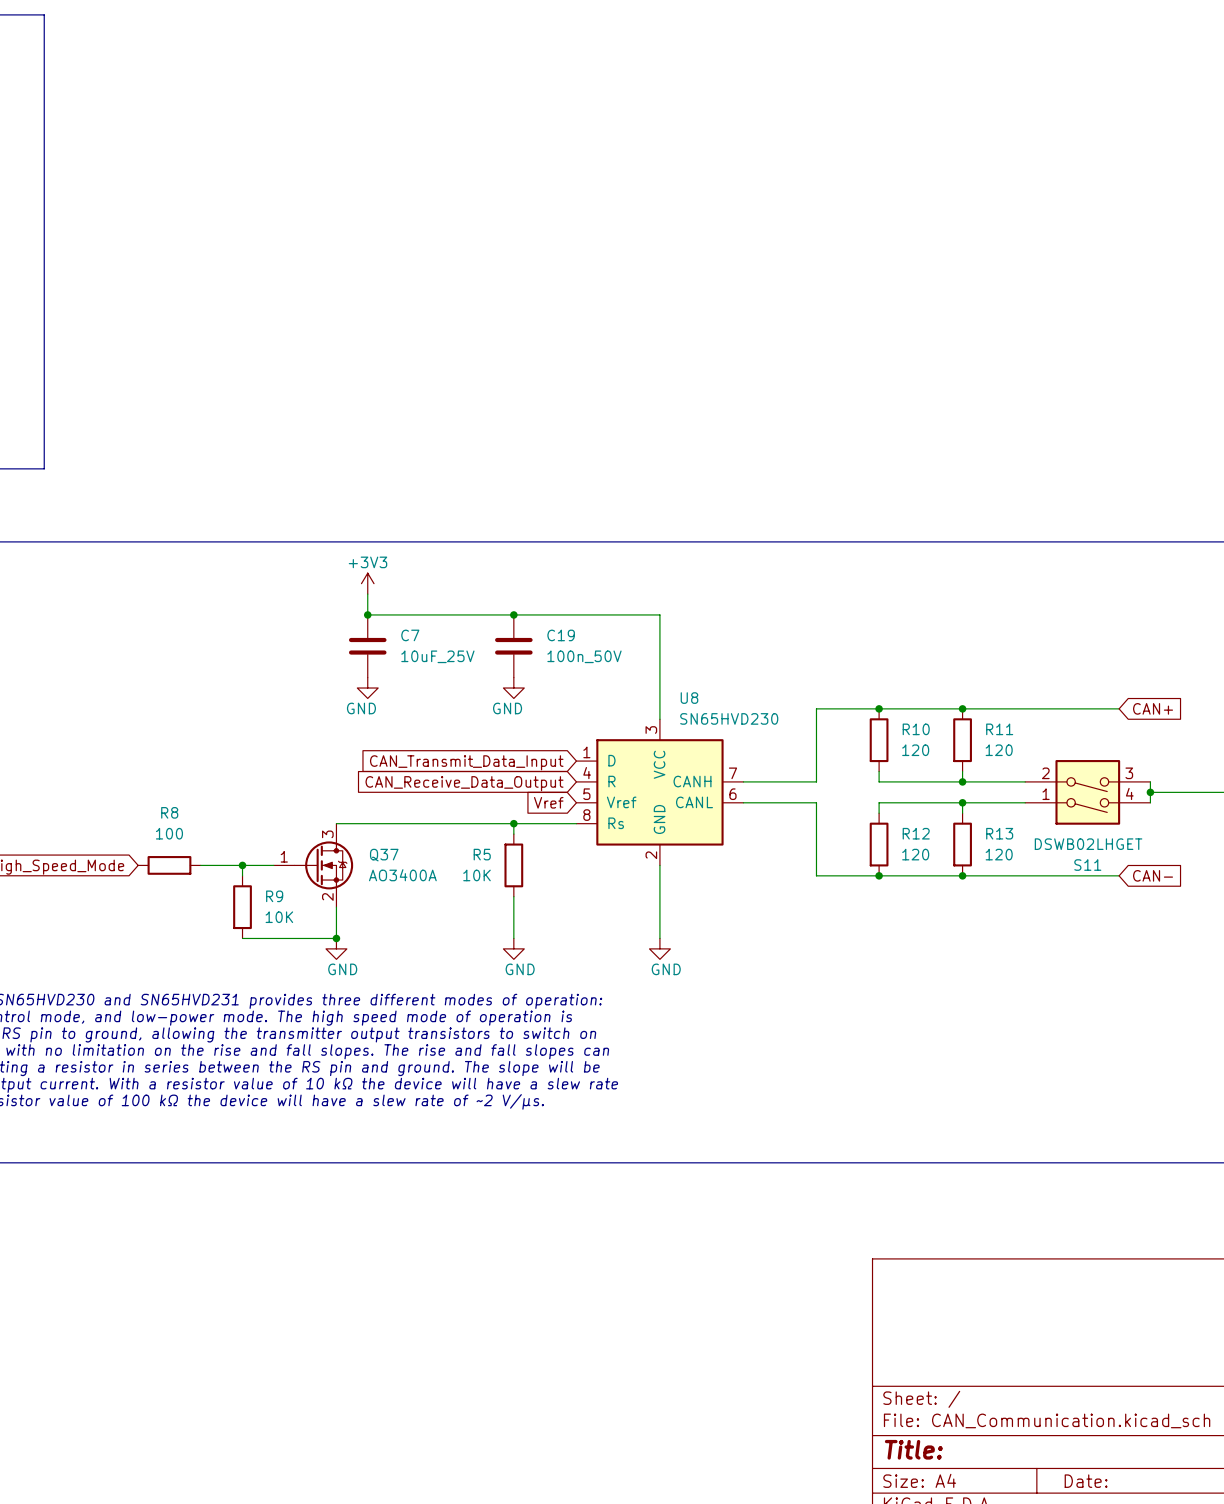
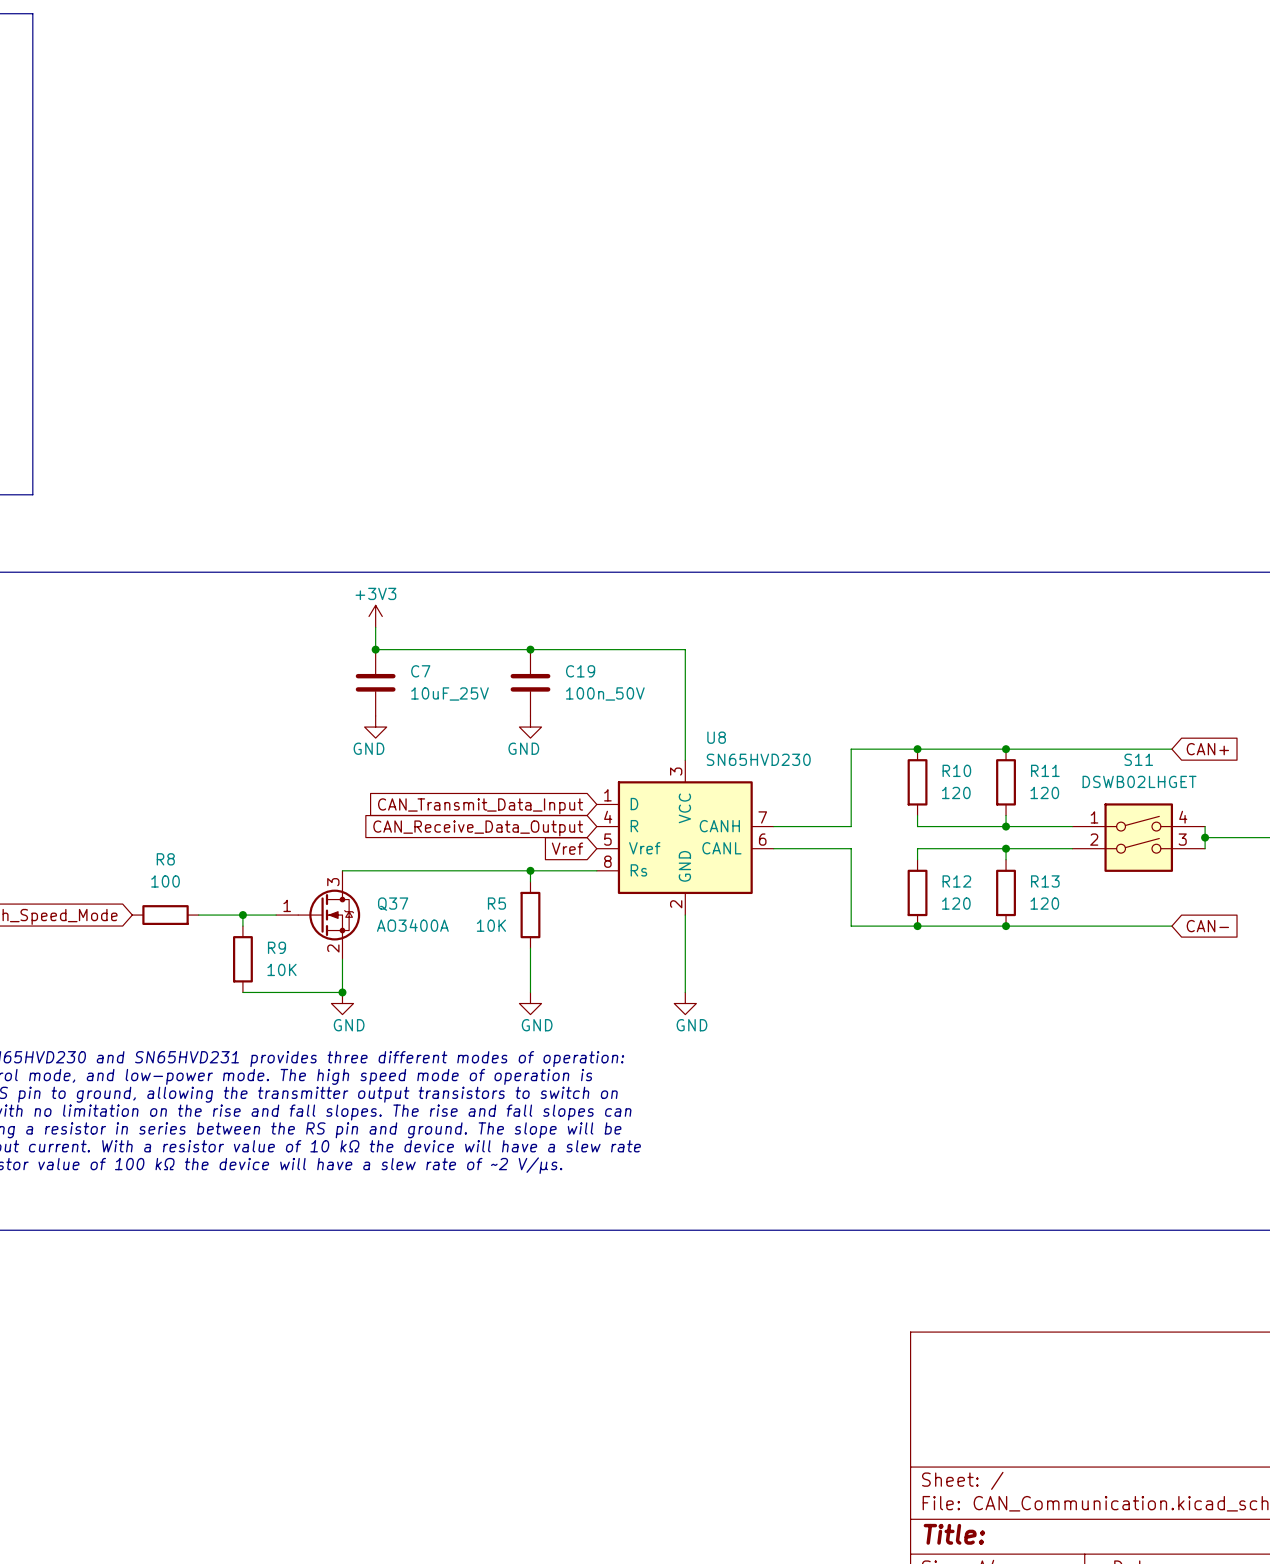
S11 flip: as is (1087, 792) -> up-down (1138, 837)

